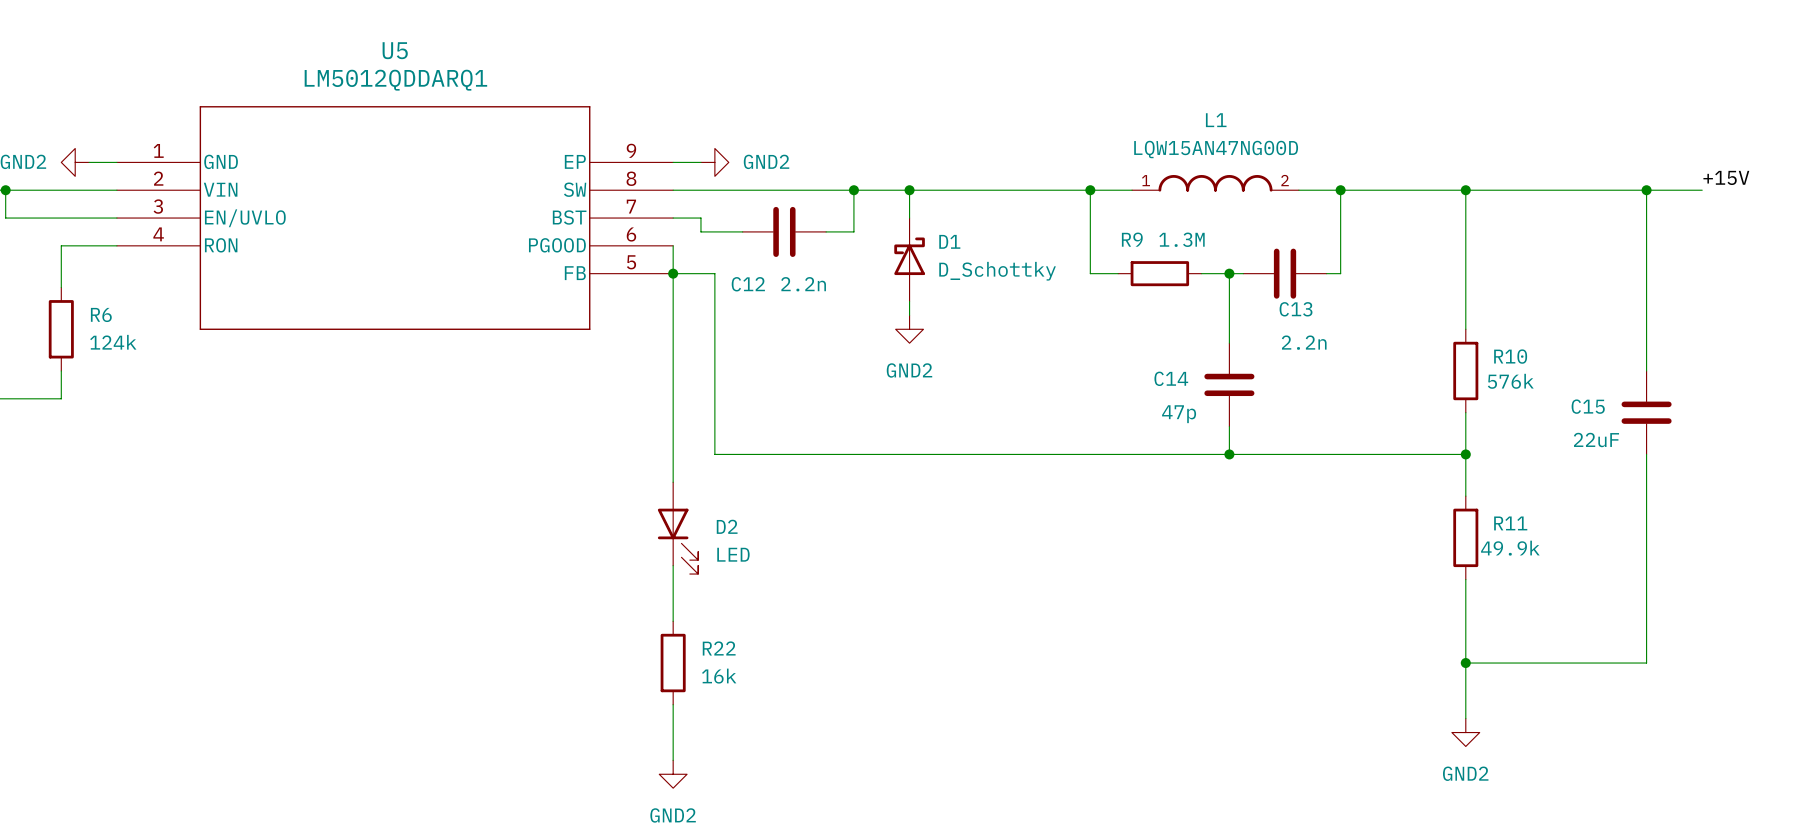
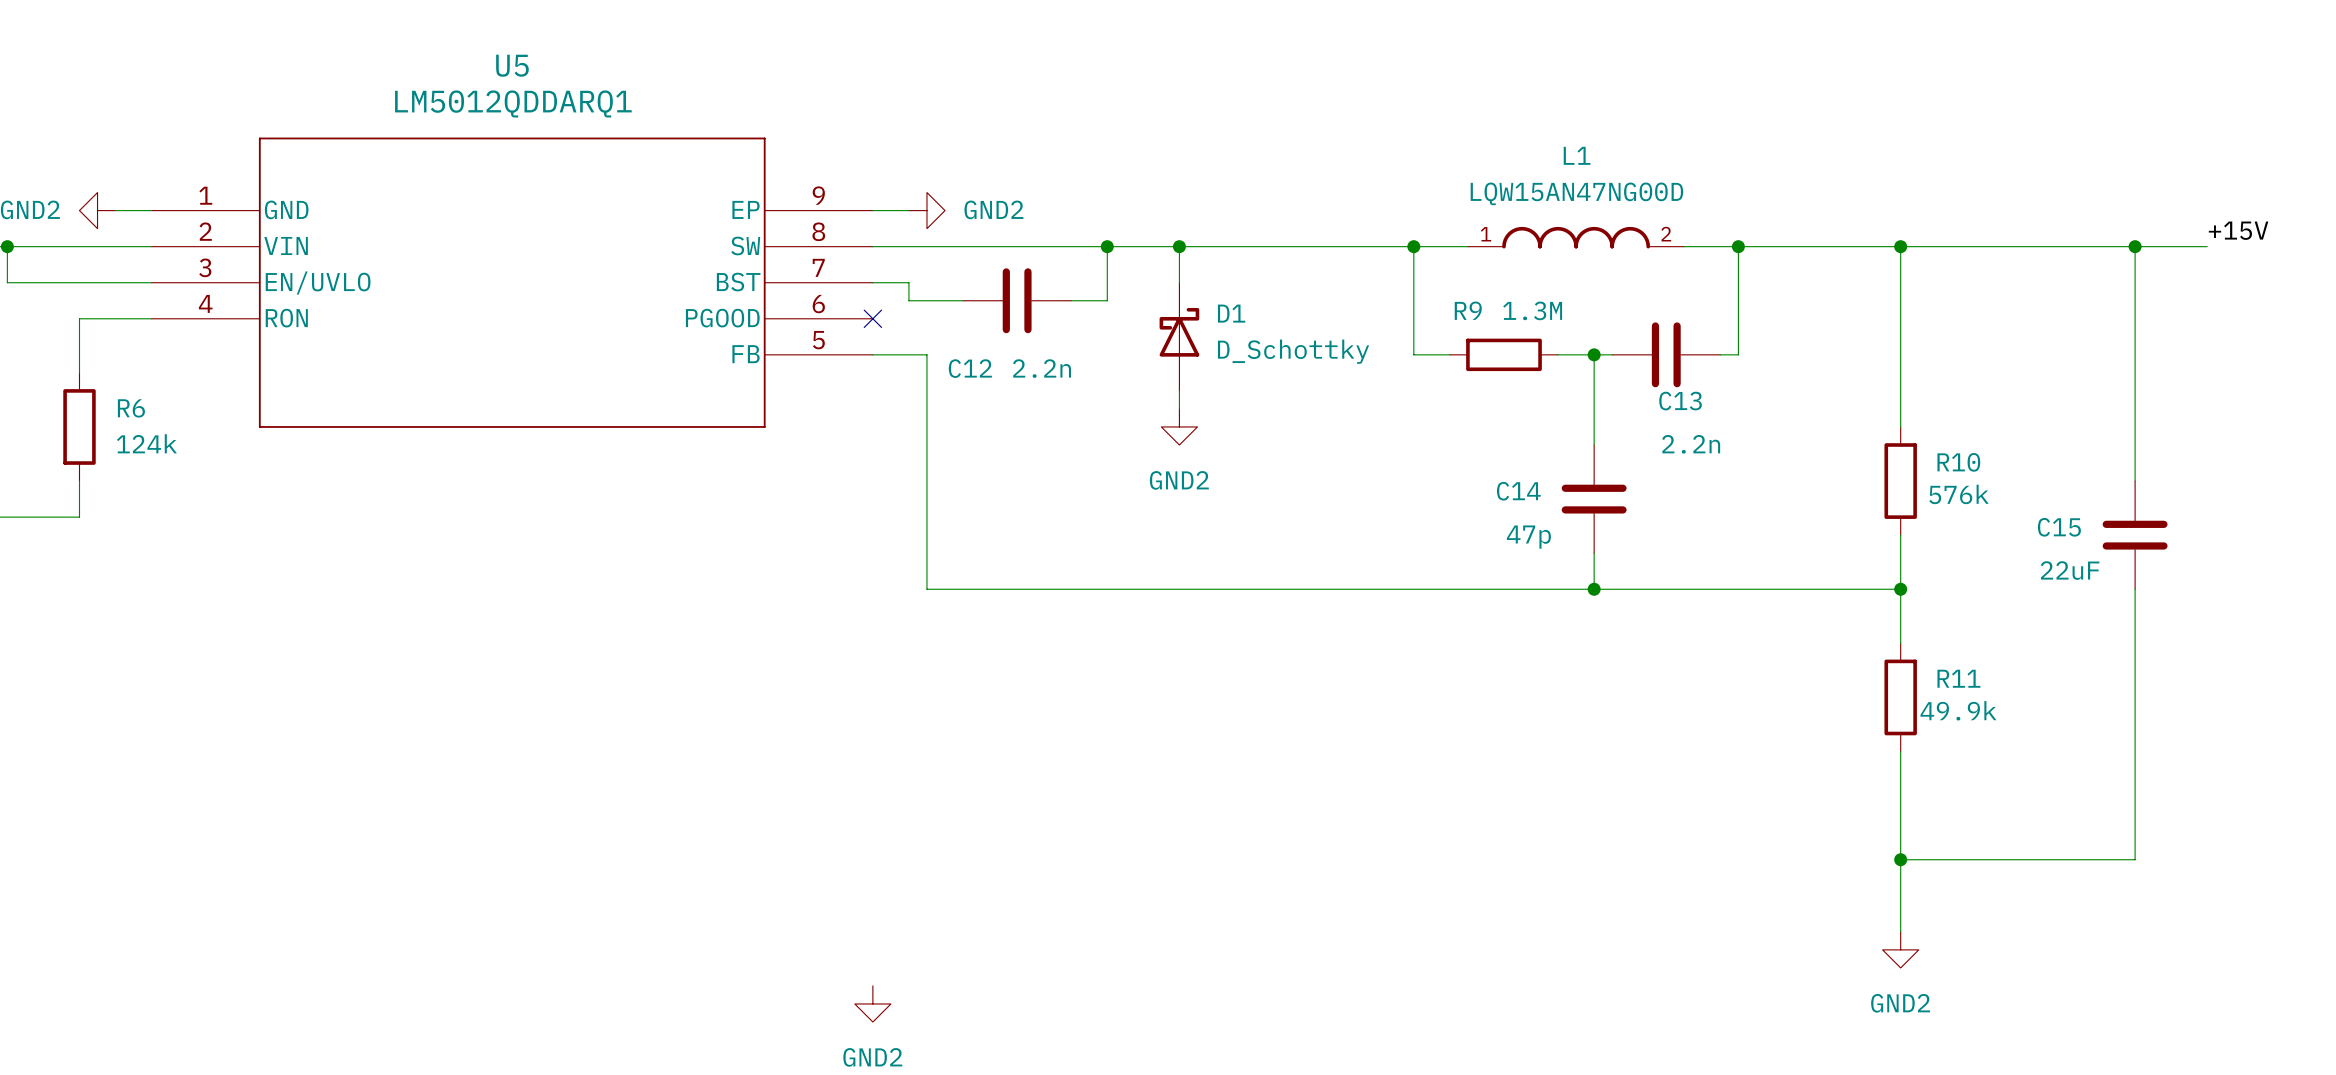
wire: (673, 245) (673, 482) -> none
no-connect mark: none -> (872, 318)
junction: (673, 273) -> none
D2: LED (678, 528) -> none
wire: (673, 565) (673, 621) -> none
R22: 16k (673, 663) -> none
wire: (673, 704) (673, 760) -> none

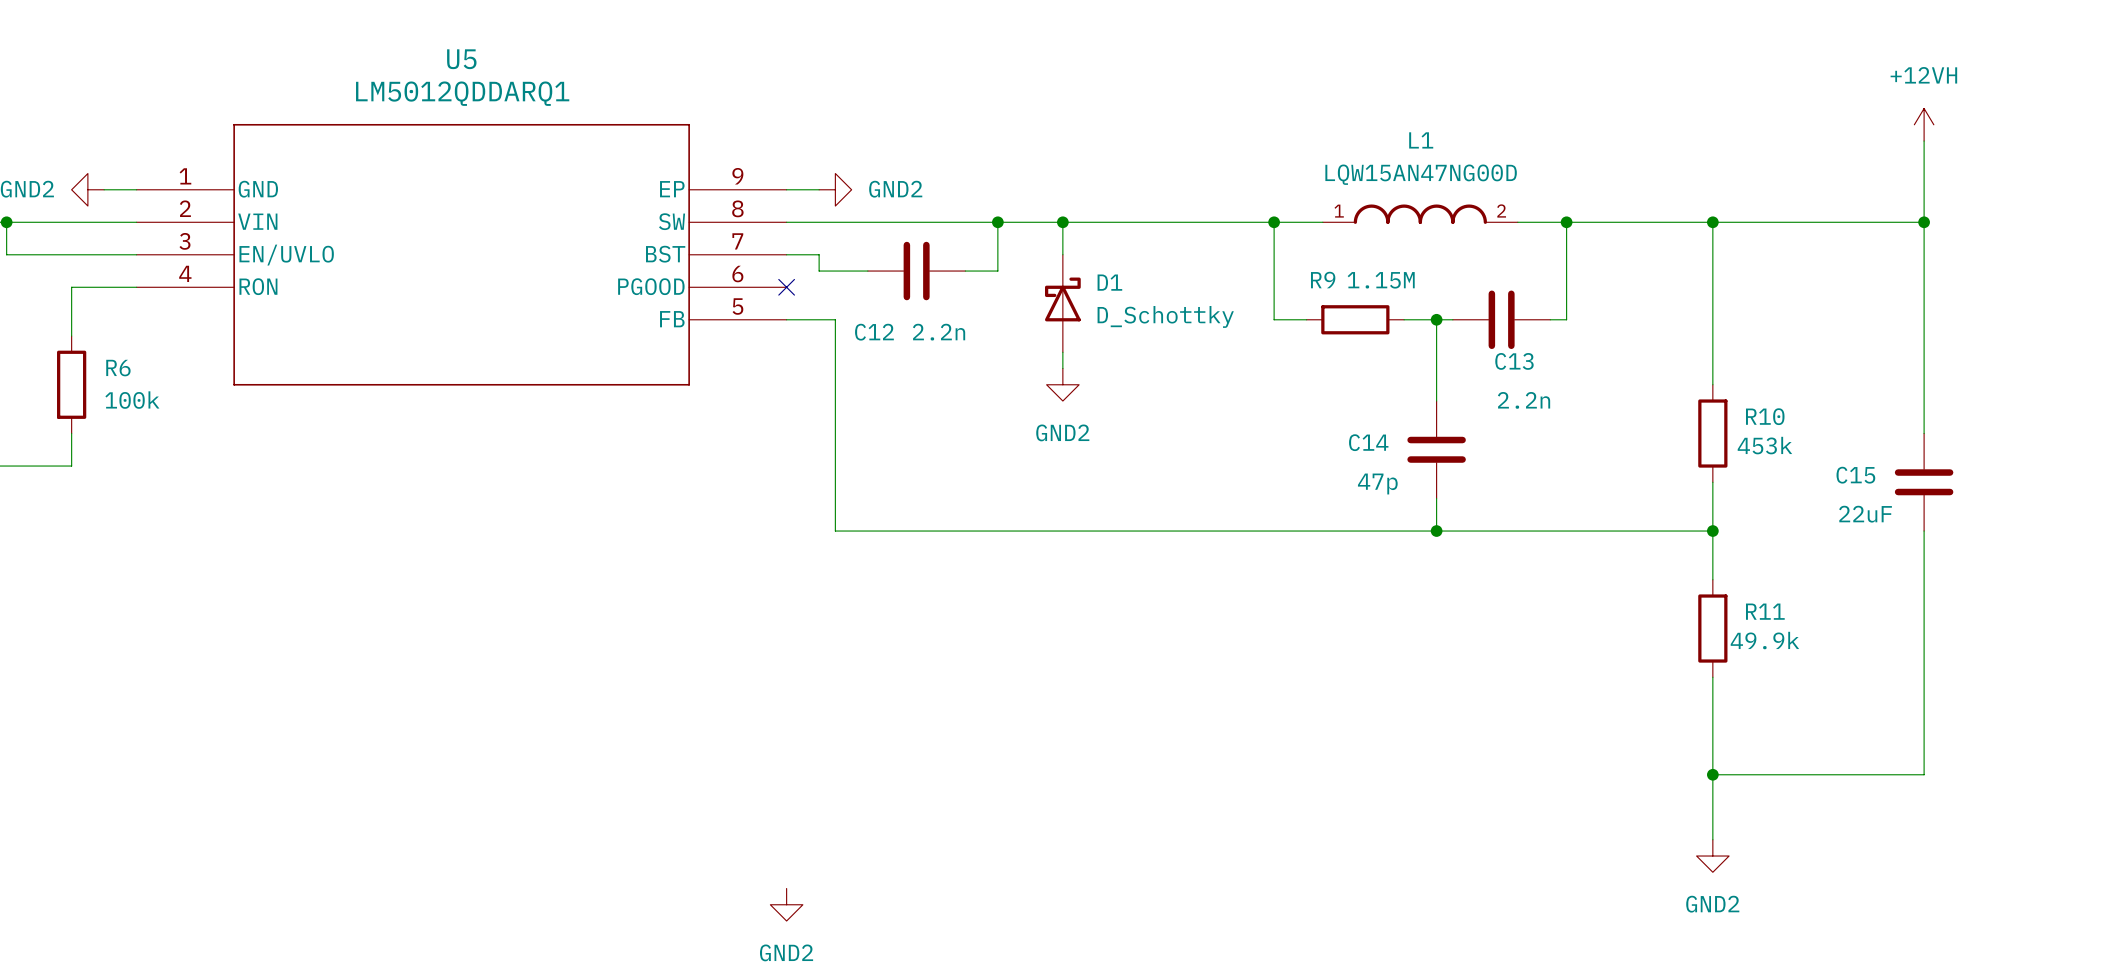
power symbol: none -> +12VH (1924, 124)
label: +15V (2238, 230) -> none
wire: (2135, 246) (2207, 246) -> (1924, 222) (1924, 141)
R9 value: 1.3M (1532, 310) -> 1.15M (1381, 280)
R6 value: 124k (146, 443) -> 100k (132, 400)
R10 value: 576k (1958, 494) -> 453k (1764, 445)

